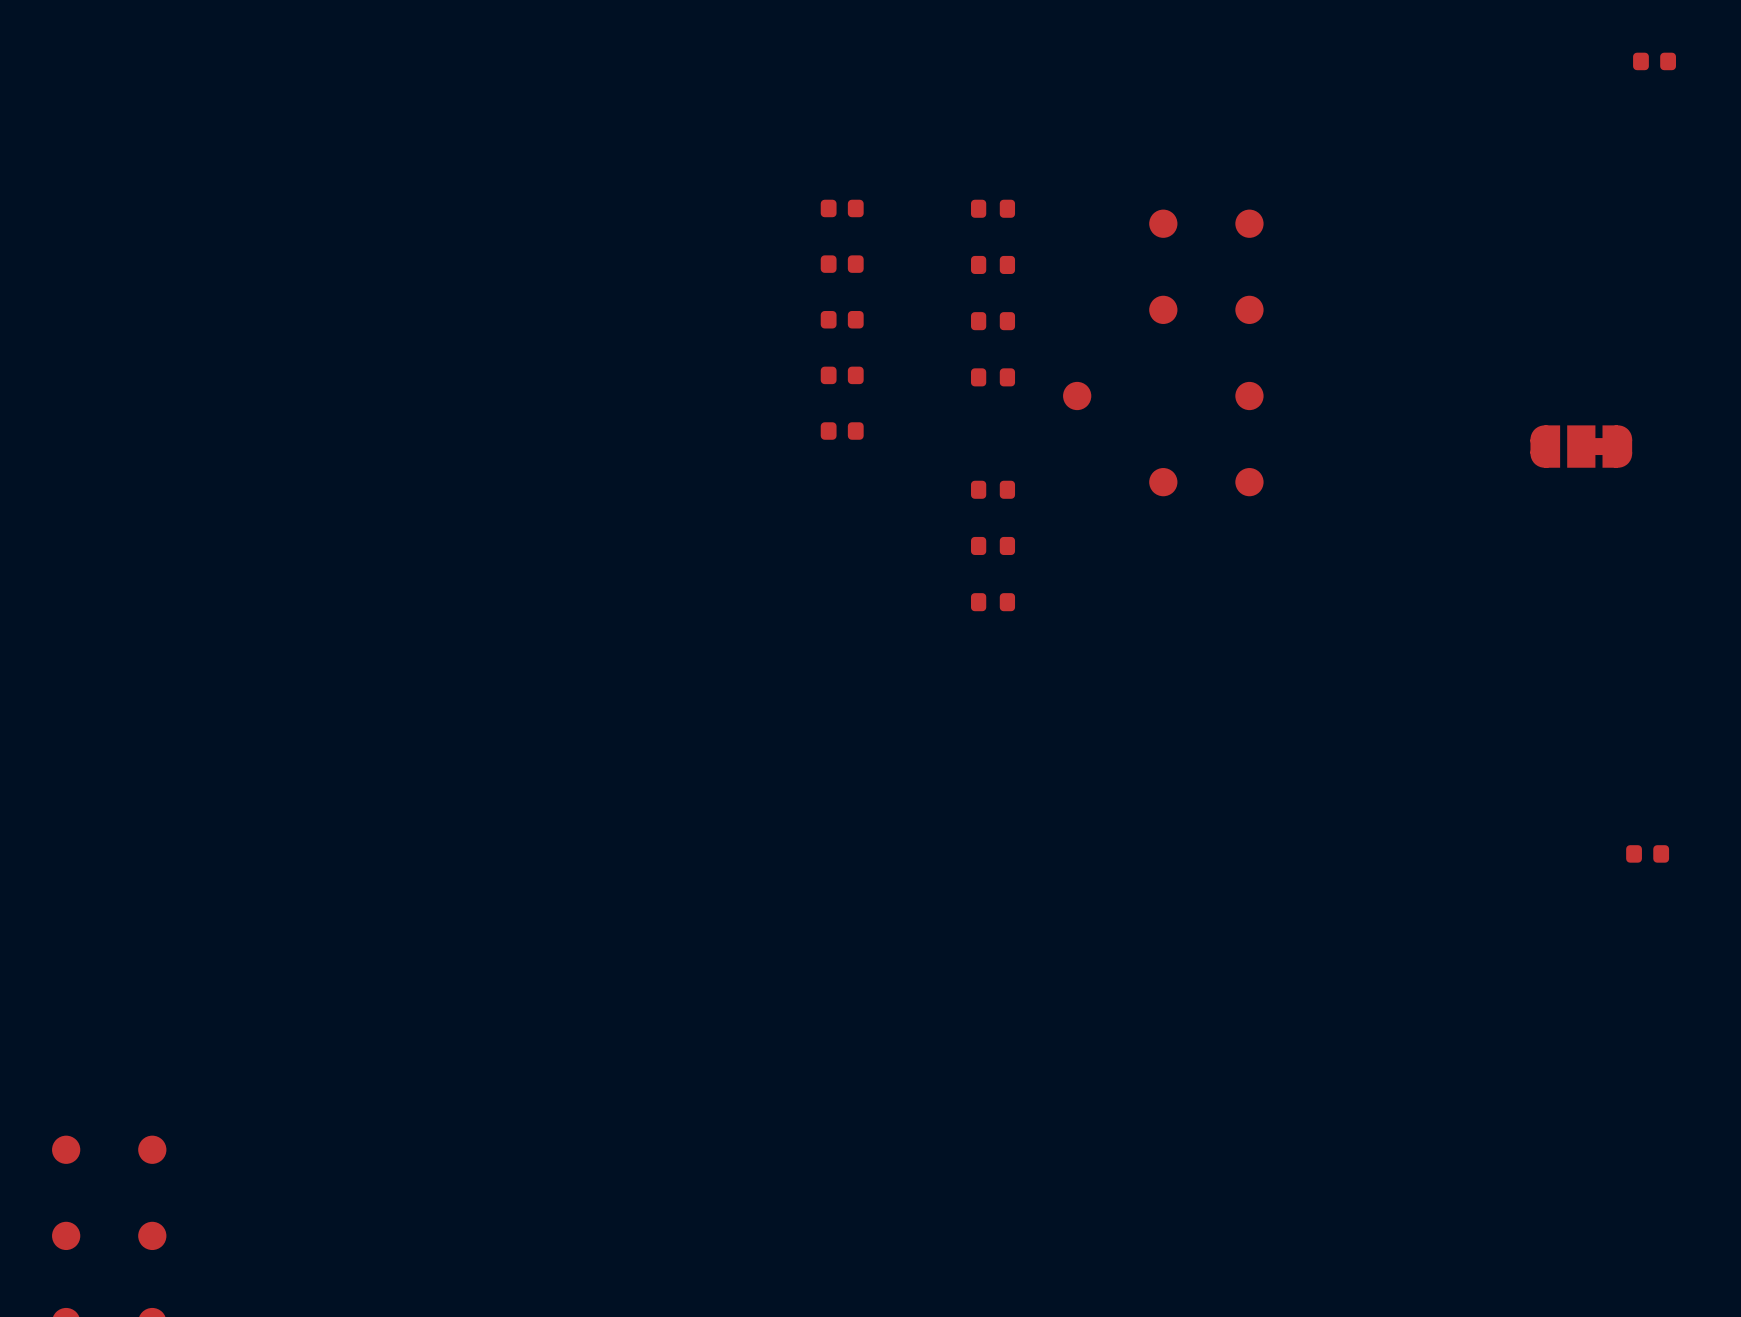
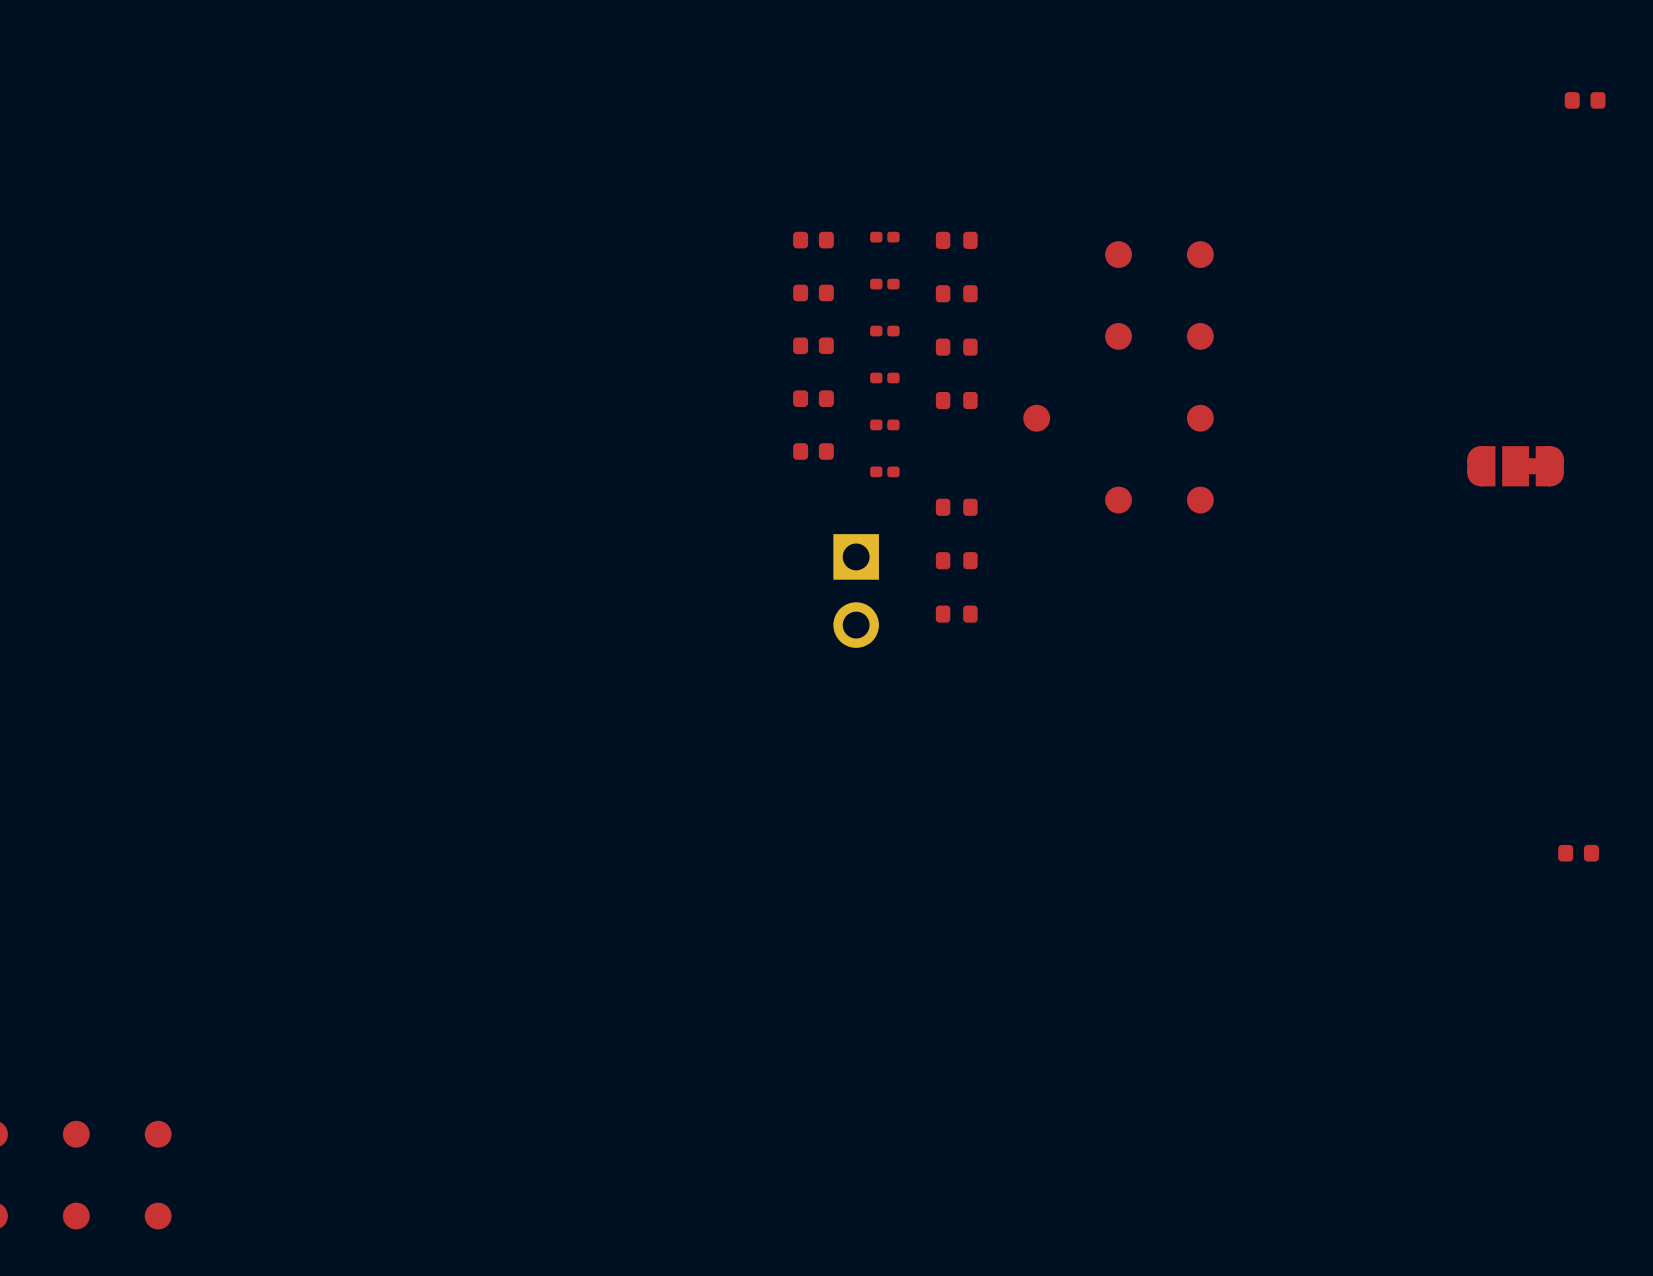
part: none -> (884, 237)
part: none -> (884, 284)
part: none -> (884, 331)
part: none -> (884, 377)
part: none -> (884, 424)
part: none -> (884, 471)
part: none -> (856, 591)

